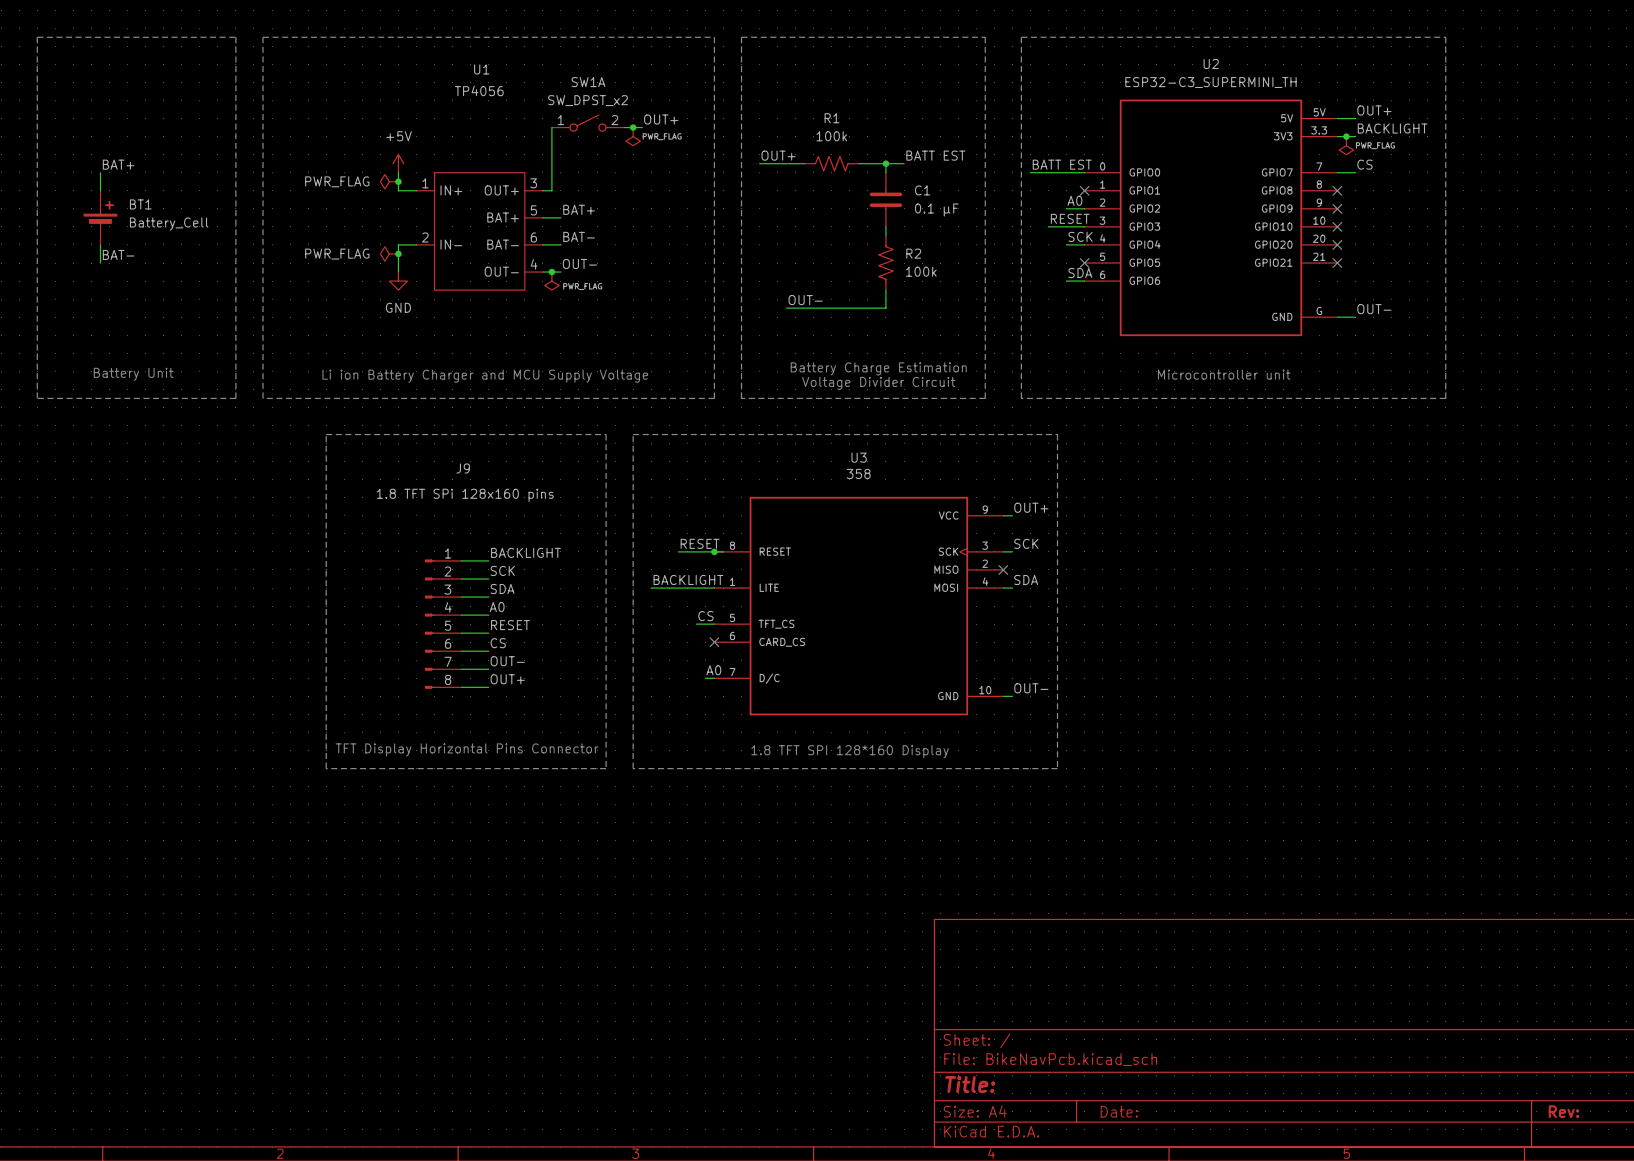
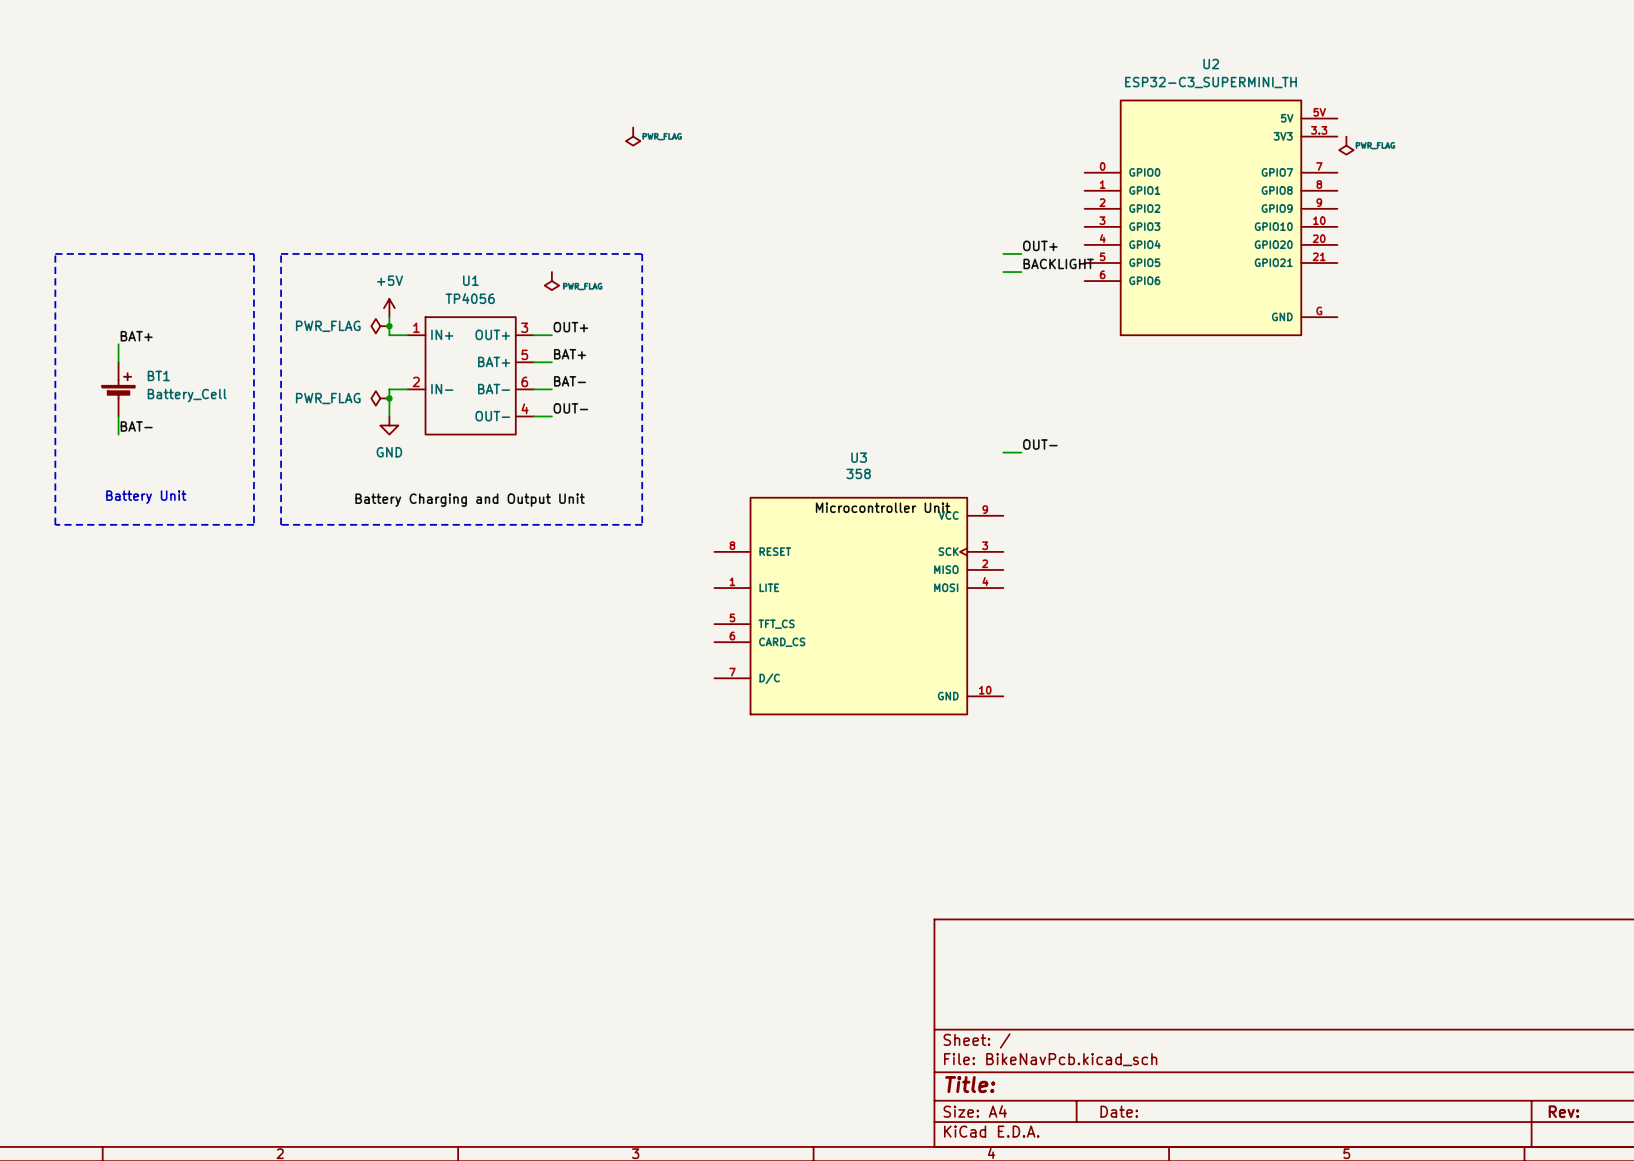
line: (37, 37) (235, 37) (235, 398) (37, 398) (37, 37) -> none
line: (263, 37) (714, 37) (714, 398) (263, 398) (263, 37) -> none
line: (741, 37) (985, 37) (985, 398) (741, 398) (741, 37) -> none
line: (1021, 37) (1445, 37) (1445, 398) (1021, 398) (1021, 37) -> none
U1 name position: U1 (481, 69) -> U1 (470, 280)
U1 value position: TP4056 (479, 90) -> TP4056 (470, 298)
label: OUT+ (1374, 110) -> none
wire: (1337, 118) (1355, 118) -> none
label: OUT+ (661, 119) -> none
SW1A: SW_DPST_x2 (588, 123) -> none
wire: (551, 127) (551, 190) (542, 190) -> none
wire: (624, 127) (642, 127) -> none
junction: (633, 127) -> none
label: BACKLIGHT (1392, 128) -> none
wire: (1337, 136) (1355, 136) -> none
junction: (1346, 136) -> none
label: OUT+ (778, 155) -> none
label: BATT EST (935, 155) -> none
power symbol position: +5V (398, 163) -> +5V (389, 308)
wire: (759, 163) (804, 163) -> none
R1: 100k (831, 163) -> none
wire: (858, 163) (904, 163) -> none
wire: (885, 163) (885, 172) -> none
junction: (885, 163) -> none
label position: BAT+ (118, 164) -> BAT+ (136, 336)
label: BATT EST (1062, 164) -> none
label: CS (1364, 164) -> none
wire: (100, 172) (100, 190) -> (118, 344) (118, 362)
wire: (398, 172) (398, 190) (416, 190) -> (389, 317) (389, 335) (407, 335)
wire: (1030, 172) (1084, 172) -> none
wire: (1337, 172) (1355, 172) -> none
power symbol: PWR_FLAG (389, 181) -> none
junction: (398, 181) -> none
no-connect mark: (1084, 190) -> none
no-connect mark: (1337, 190) -> none
C1: 0.1 µF (885, 199) -> none
label: A0 (1074, 200) -> none
wire: (1066, 208) (1084, 208) -> none
no-connect mark: (1337, 208) -> none
label position: BAT+ (579, 209) -> BAT+ (570, 354)
BT1 position: (100, 217) -> (118, 389)
wire: (542, 217) (560, 217) -> (533, 362) (551, 362)
label: RESET (1070, 218) -> none
wire: (885, 226) (885, 235) -> none
wire: (1048, 226) (1084, 226) -> none
no-connect mark: (1337, 226) -> none
U1 position: (479, 231) -> (470, 375)
label position: BAT- (579, 236) -> BAT- (570, 381)
label: SCK (1080, 236) -> none
wire: (100, 244) (100, 263) -> (118, 416) (118, 434)
wire: (416, 244) (398, 244) (398, 272) -> (407, 389) (389, 389) (389, 416)
wire: (542, 244) (560, 244) -> (533, 389) (551, 389)
wire: (1066, 244) (1084, 244) -> (1003, 253) (1021, 253)
no-connect mark: (1337, 244) -> none
label: none -> OUT+ (1040, 245)
line: none -> (55, 253) (253, 253) (253, 524) (55, 524) (55, 253)
line: none -> (281, 253) (642, 253) (642, 524) (281, 524) (281, 253)
power symbol: PWR_FLAG (389, 253) -> none
junction: (398, 253) -> none
label position: BAT- (118, 254) -> BAT- (136, 426)
label: OUT- (579, 263) -> none
R2: 100k (885, 263) -> none
label: none -> BACKLIGHT (1058, 263)
no-connect mark: (1084, 263) -> none
no-connect mark: (1337, 263) -> none
wire: (542, 272) (560, 272) -> (533, 416) (551, 416)
junction: (551, 272) -> none
label: SDA (1080, 273) -> none
power symbol position: GND (398, 281) -> GND (389, 425)
wire: (1066, 281) (1084, 281) -> (1003, 272) (1021, 272)
wire: (885, 290) (885, 308) (786, 308) -> none
label: OUT- (805, 300) -> none
label: OUT- (1374, 309) -> none
wire: (1337, 317) (1355, 317) -> none
power symbol: none -> PWR_FLAG (380, 326)
junction: none -> (389, 326)
label: none -> OUT+ (570, 327)
wire: none -> (533, 335) (551, 335)
text: Battery Charge Estimation (878, 368) -> none
text position: Battery Unit (133, 374) -> Battery Unit (146, 497)
text: Microcontroller unit (1224, 374) -> none
text: Li ion Battery Charger and MCU Supply Voltage (485, 376) -> none
text: Voltage Divider Circuit (878, 383) -> none
power symbol: none -> PWR_FLAG (380, 398)
junction: none -> (389, 398)
label: none -> OUT- (570, 408)
line: (326, 434) (606, 434) (606, 768) (326, 768) (326, 434) -> none
line: (633, 434) (1057, 434) (1057, 768) (633, 768) (633, 434) -> none
label: none -> OUT- (1040, 444)
wire: none -> (1003, 452) (1021, 452)
label: none -> Battery Charging and Output Unit (470, 500)
label: none -> Microcontroller Unit (883, 507)
label: OUT+ (1031, 507) -> none
wire: (1003, 515) (1012, 515) -> none
label: RESET (700, 543) -> none
label: SCK (1026, 543) -> none
wire: (678, 551) (723, 551) -> none
junction: (714, 551) -> none
wire: (1003, 551) (1012, 551) -> none
label: BACKLIGHT (525, 552) -> none
wire: (461, 560) (488, 560) -> none
no-connect mark: (1003, 569) -> none
label: SCK (502, 570) -> none
wire: (461, 578) (488, 578) -> none
label: BACKLIGHT (688, 579) -> none
label: SDA (1026, 579) -> none
label: SDA (502, 588) -> none
wire: (651, 588) (714, 588) -> none
wire: (1003, 588) (1012, 588) -> none
wire: (461, 597) (488, 597) -> none
label: A0 (497, 607) -> none
wire: (461, 615) (488, 615) -> none
label: CS (705, 616) -> none
J9: 1.8 TFT SPi 128x160 pins (443, 624) -> none
wire: (696, 624) (714, 624) -> none
label: RESET (510, 625) -> none
wire: (461, 633) (488, 633) -> none
no-connect mark: (714, 642) -> none
label: CS (498, 643) -> none
wire: (461, 651) (488, 651) -> none
label: OUT- (507, 661) -> none
wire: (461, 669) (488, 669) -> none
label: A0 (713, 670) -> none
wire: (705, 678) (714, 678) -> none
label: OUT+ (507, 679) -> none
wire: (461, 687) (488, 687) -> none
label: OUT- (1031, 688) -> none
wire: (1003, 696) (1012, 696) -> none
text: TFT Display Horizontal Pins Connector (467, 749) -> none
text: 1.8 TFT SPI 128*160 Display (850, 751) -> none

